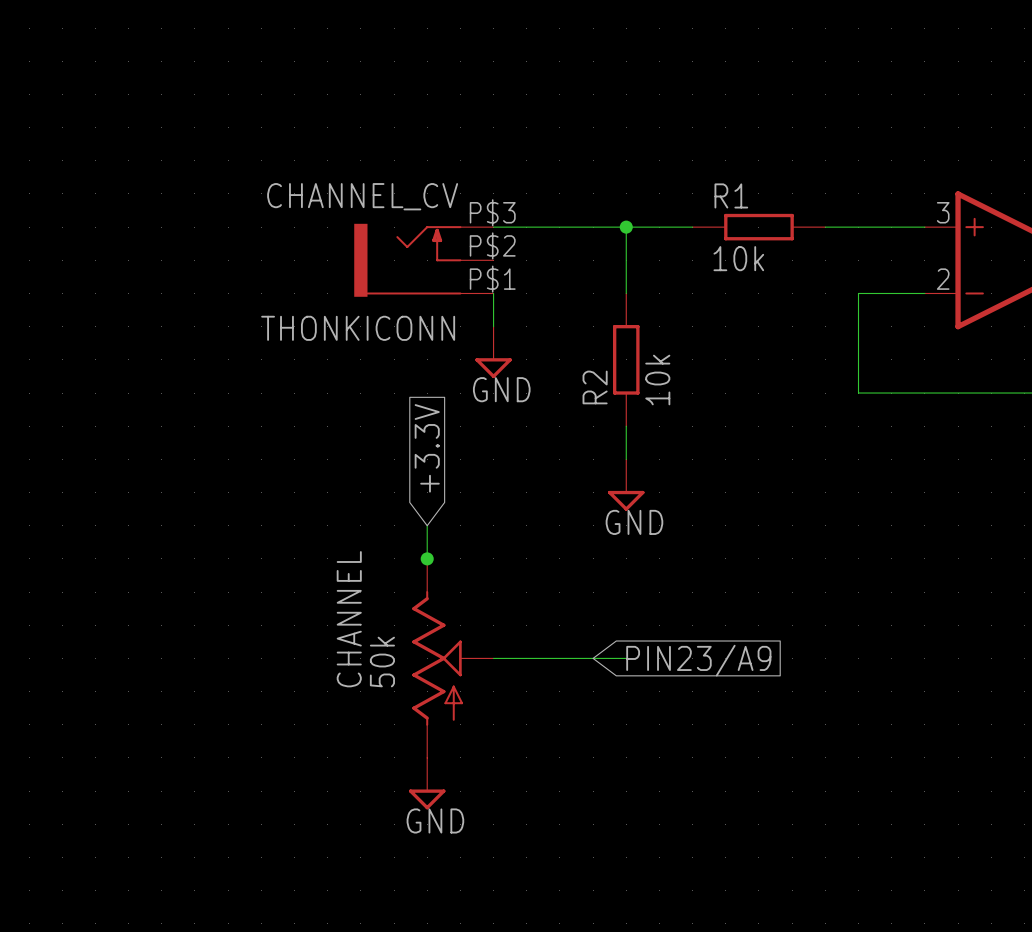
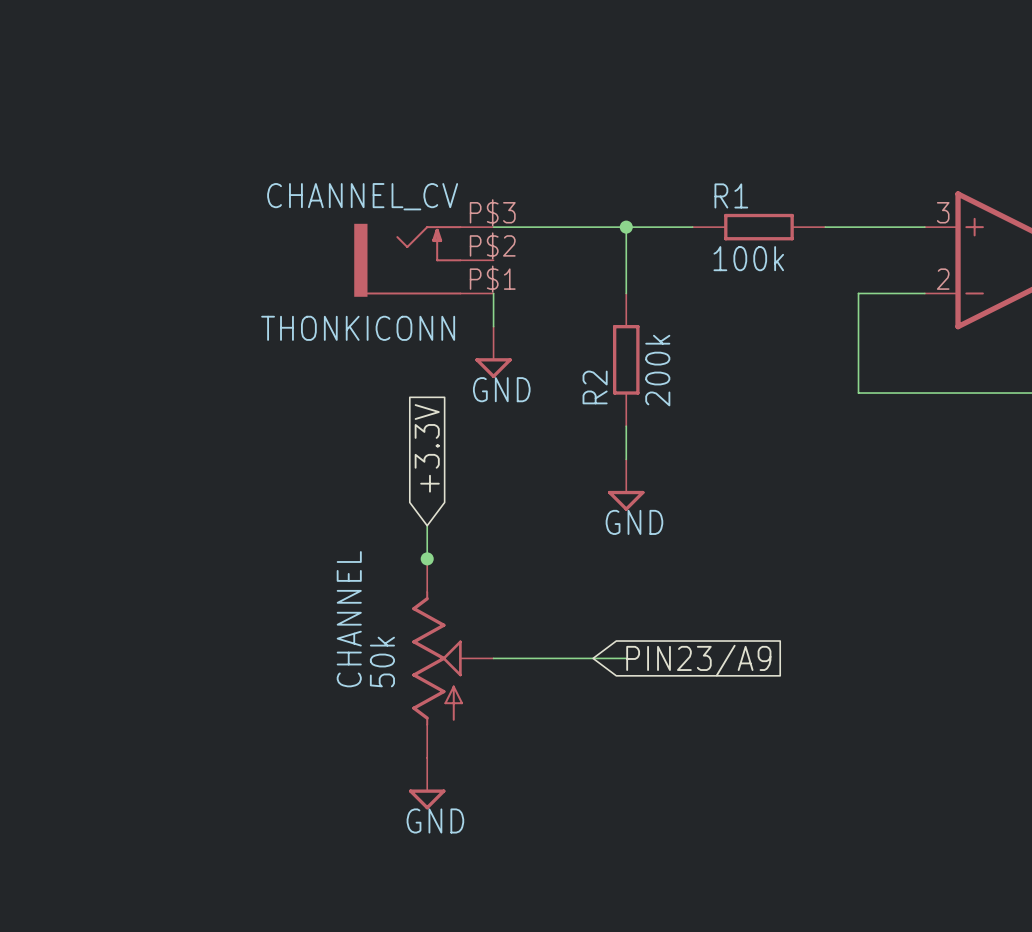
R1 value: 10k (738, 258) -> 100k (748, 258)
R2 value: 10k (657, 380) -> 200k (657, 370)

